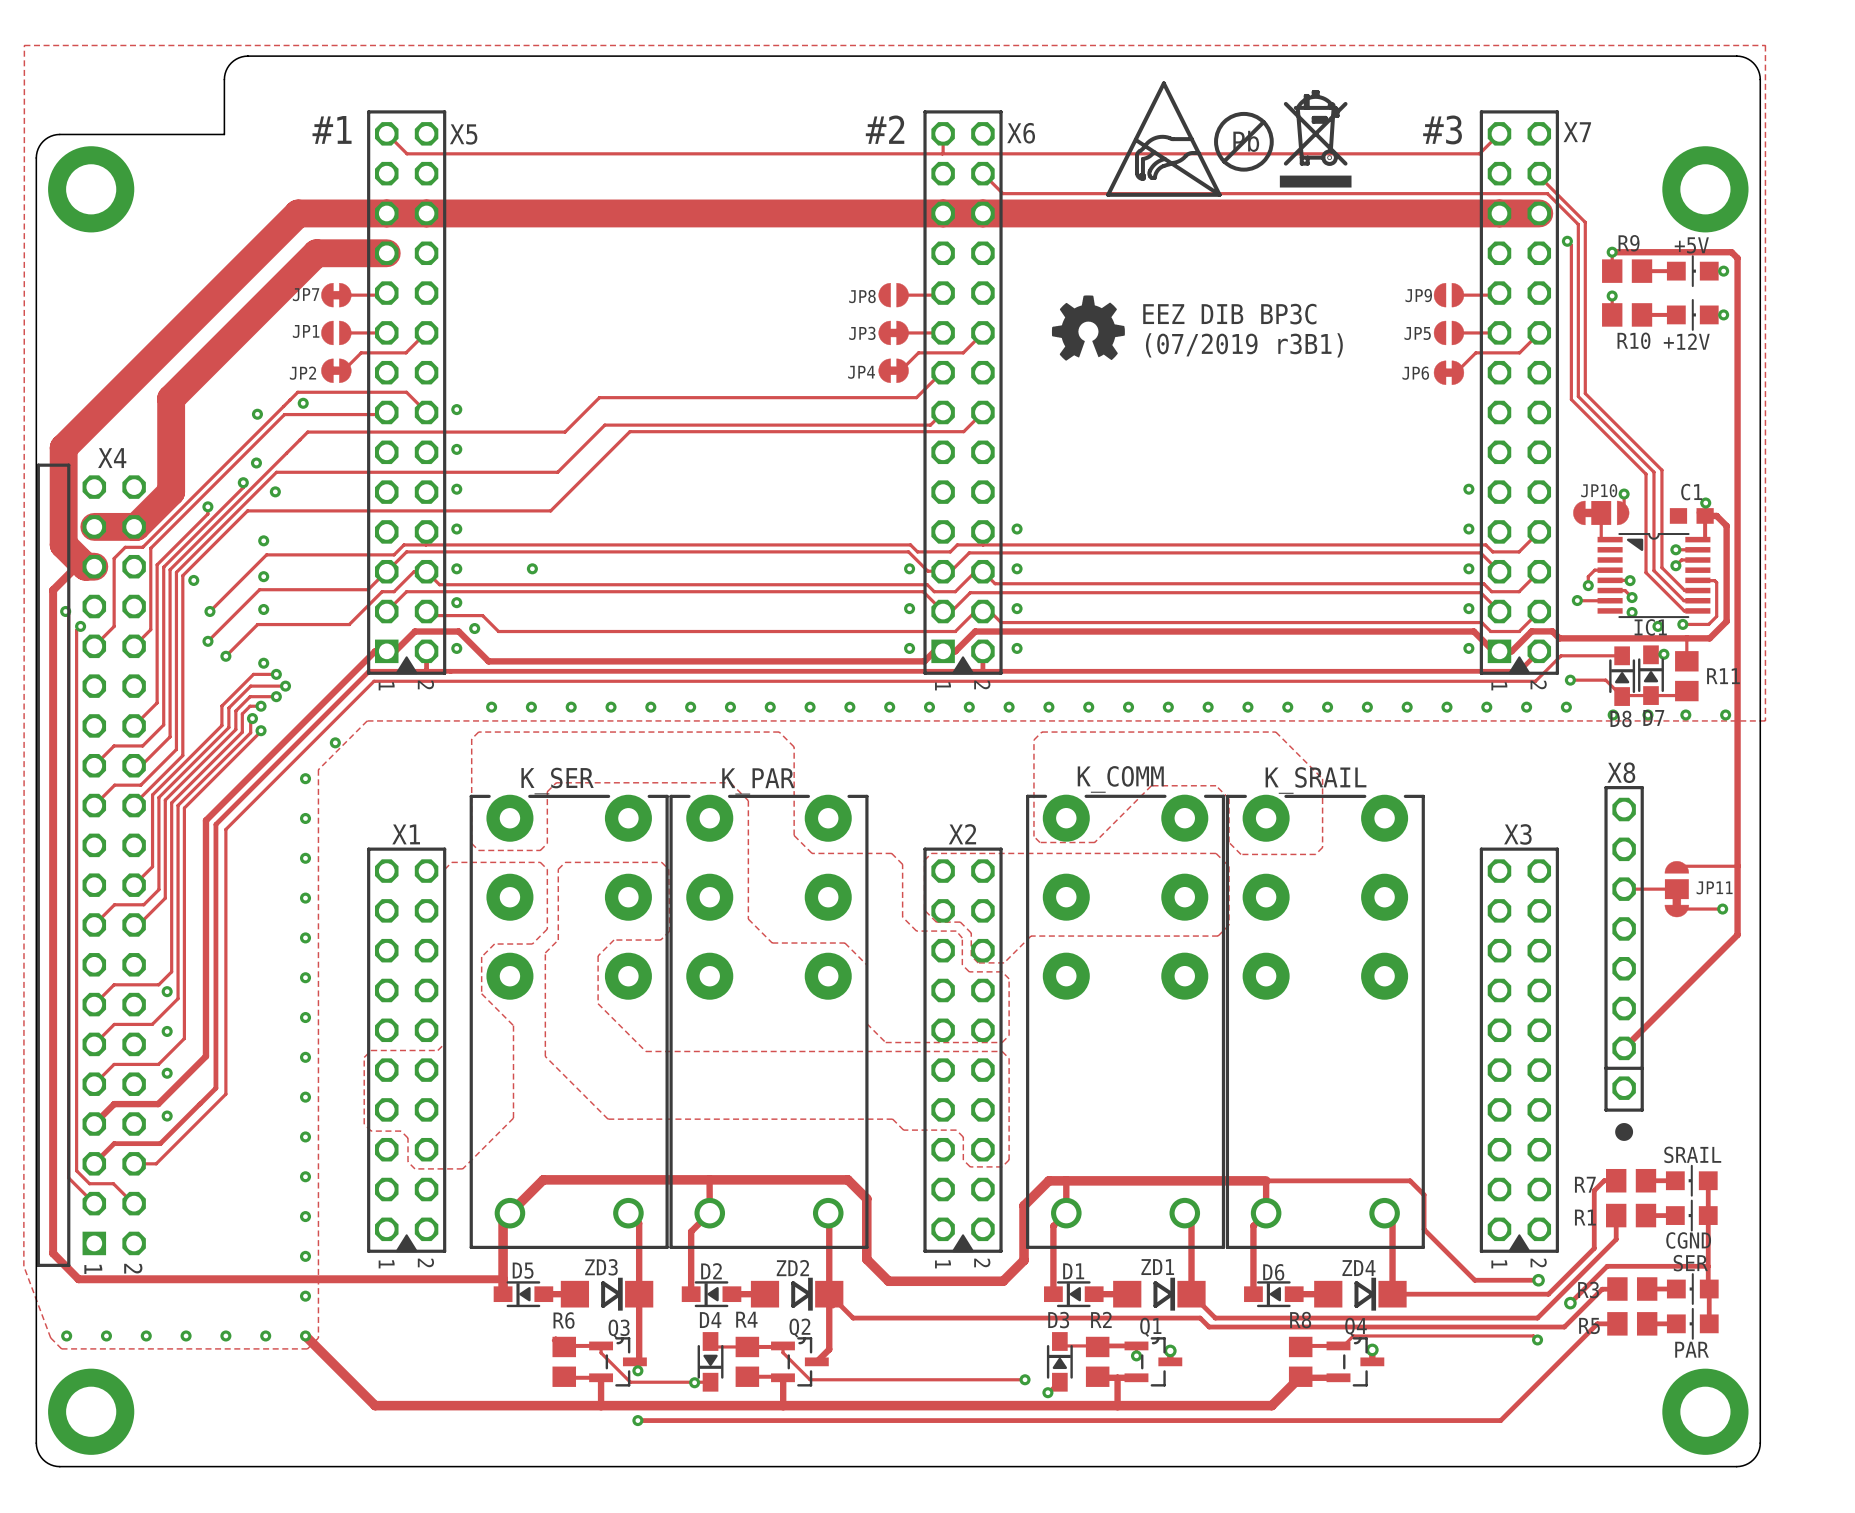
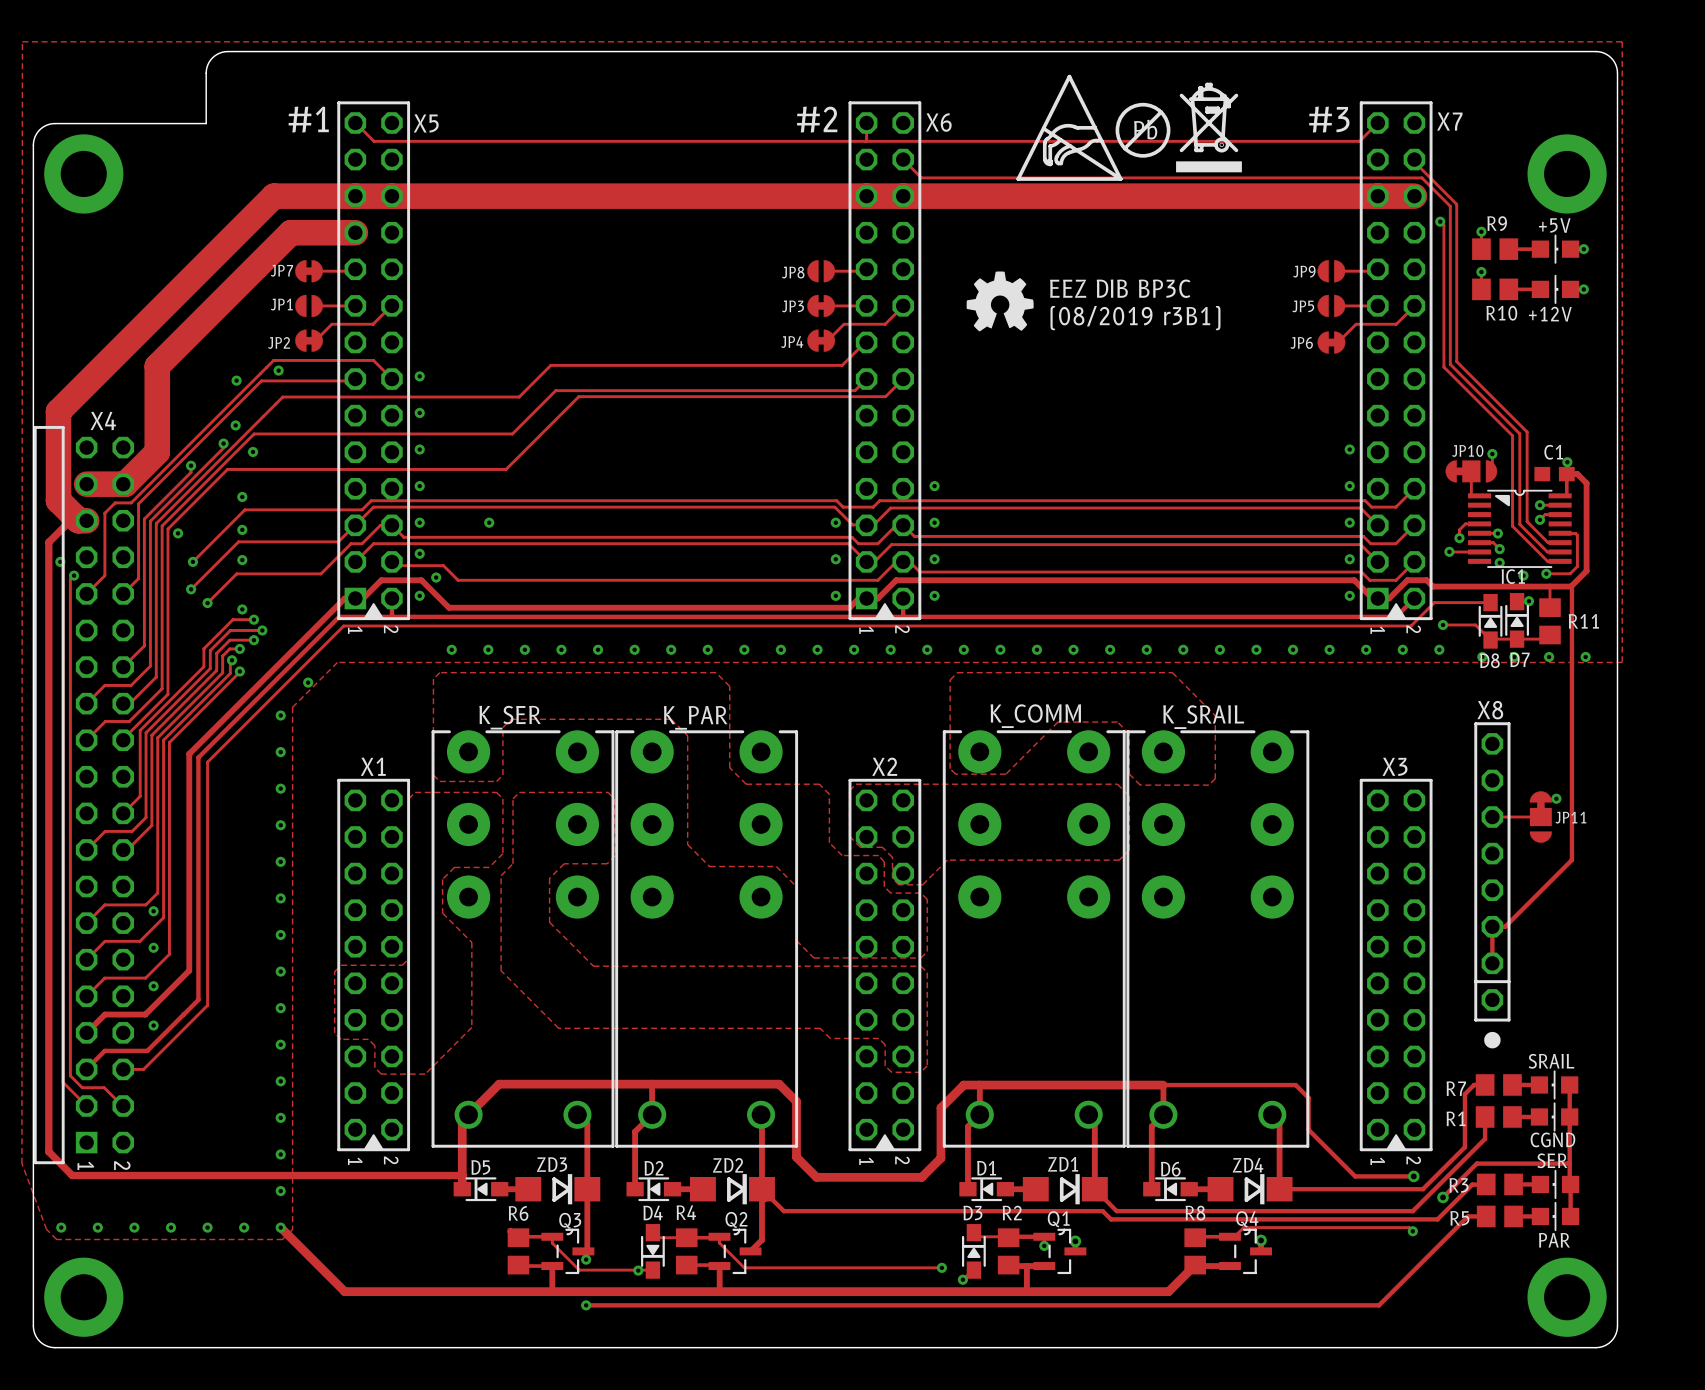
track: (1612, 252) (1731, 252) (1737, 258) (1737, 934) (1624, 1048) -> (1571, 586) (1571, 860) (1505, 926) (1492, 926) (1492, 963)
text: (07/2019 r3B1) (1244, 345) -> (08/2019 r3B1) (1135, 318)
track: (1676, 866) (1737, 866) -> none
JP11 rotation: 0° (1676, 889) -> 180° (1540, 817)
track: (1676, 909) (1722, 909) -> none
via position: (1722, 909) -> (1556, 798)

